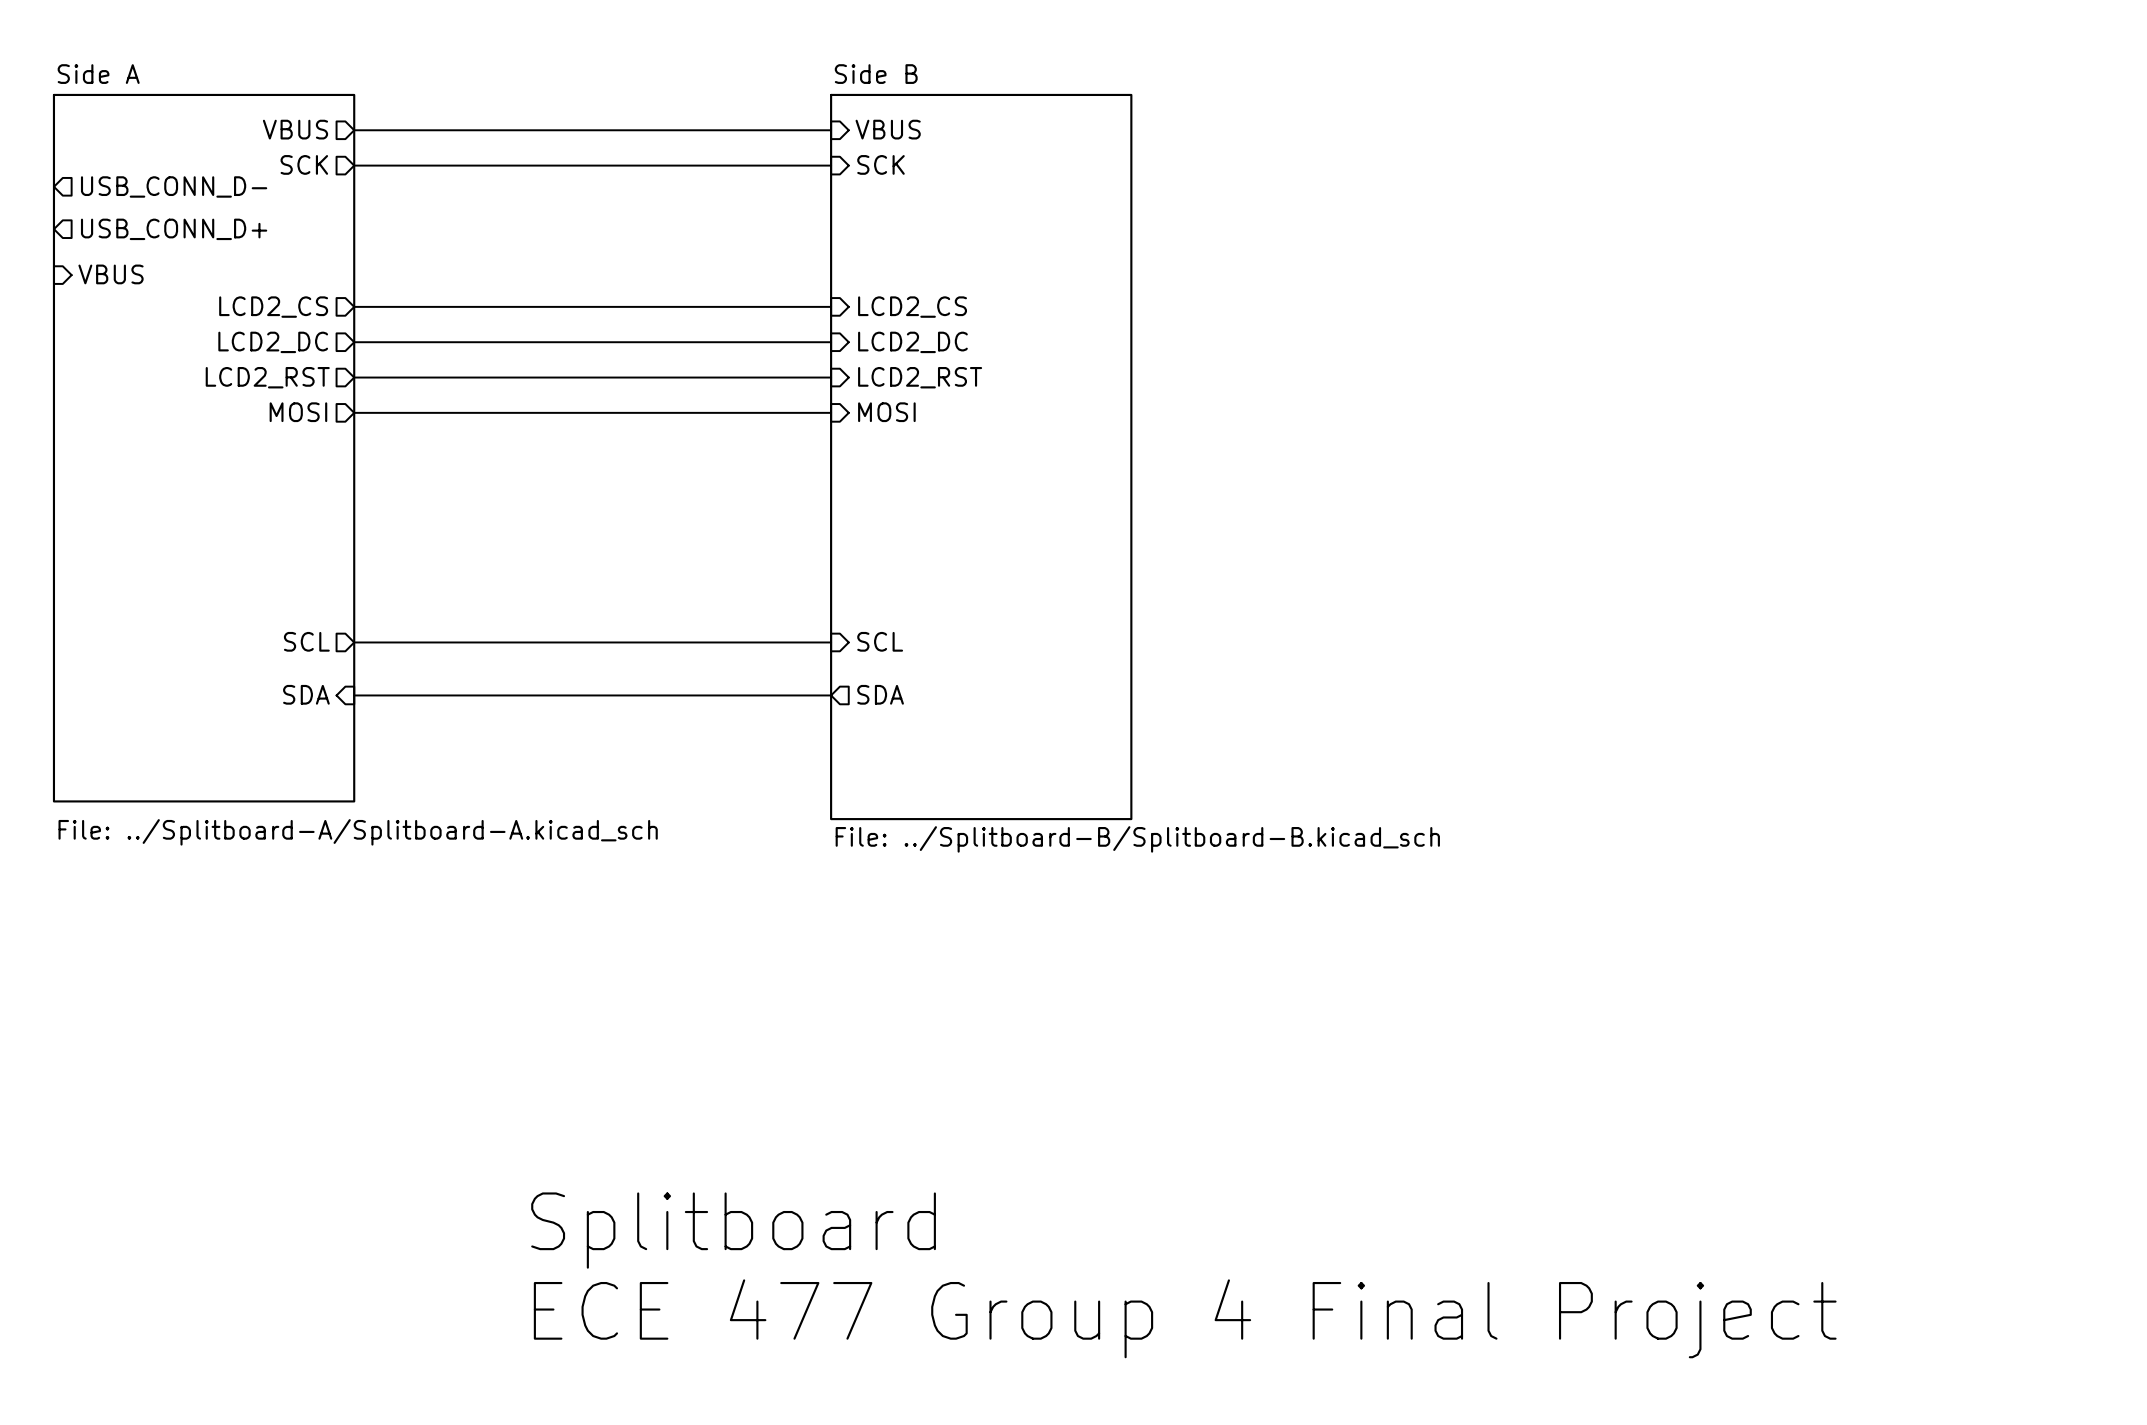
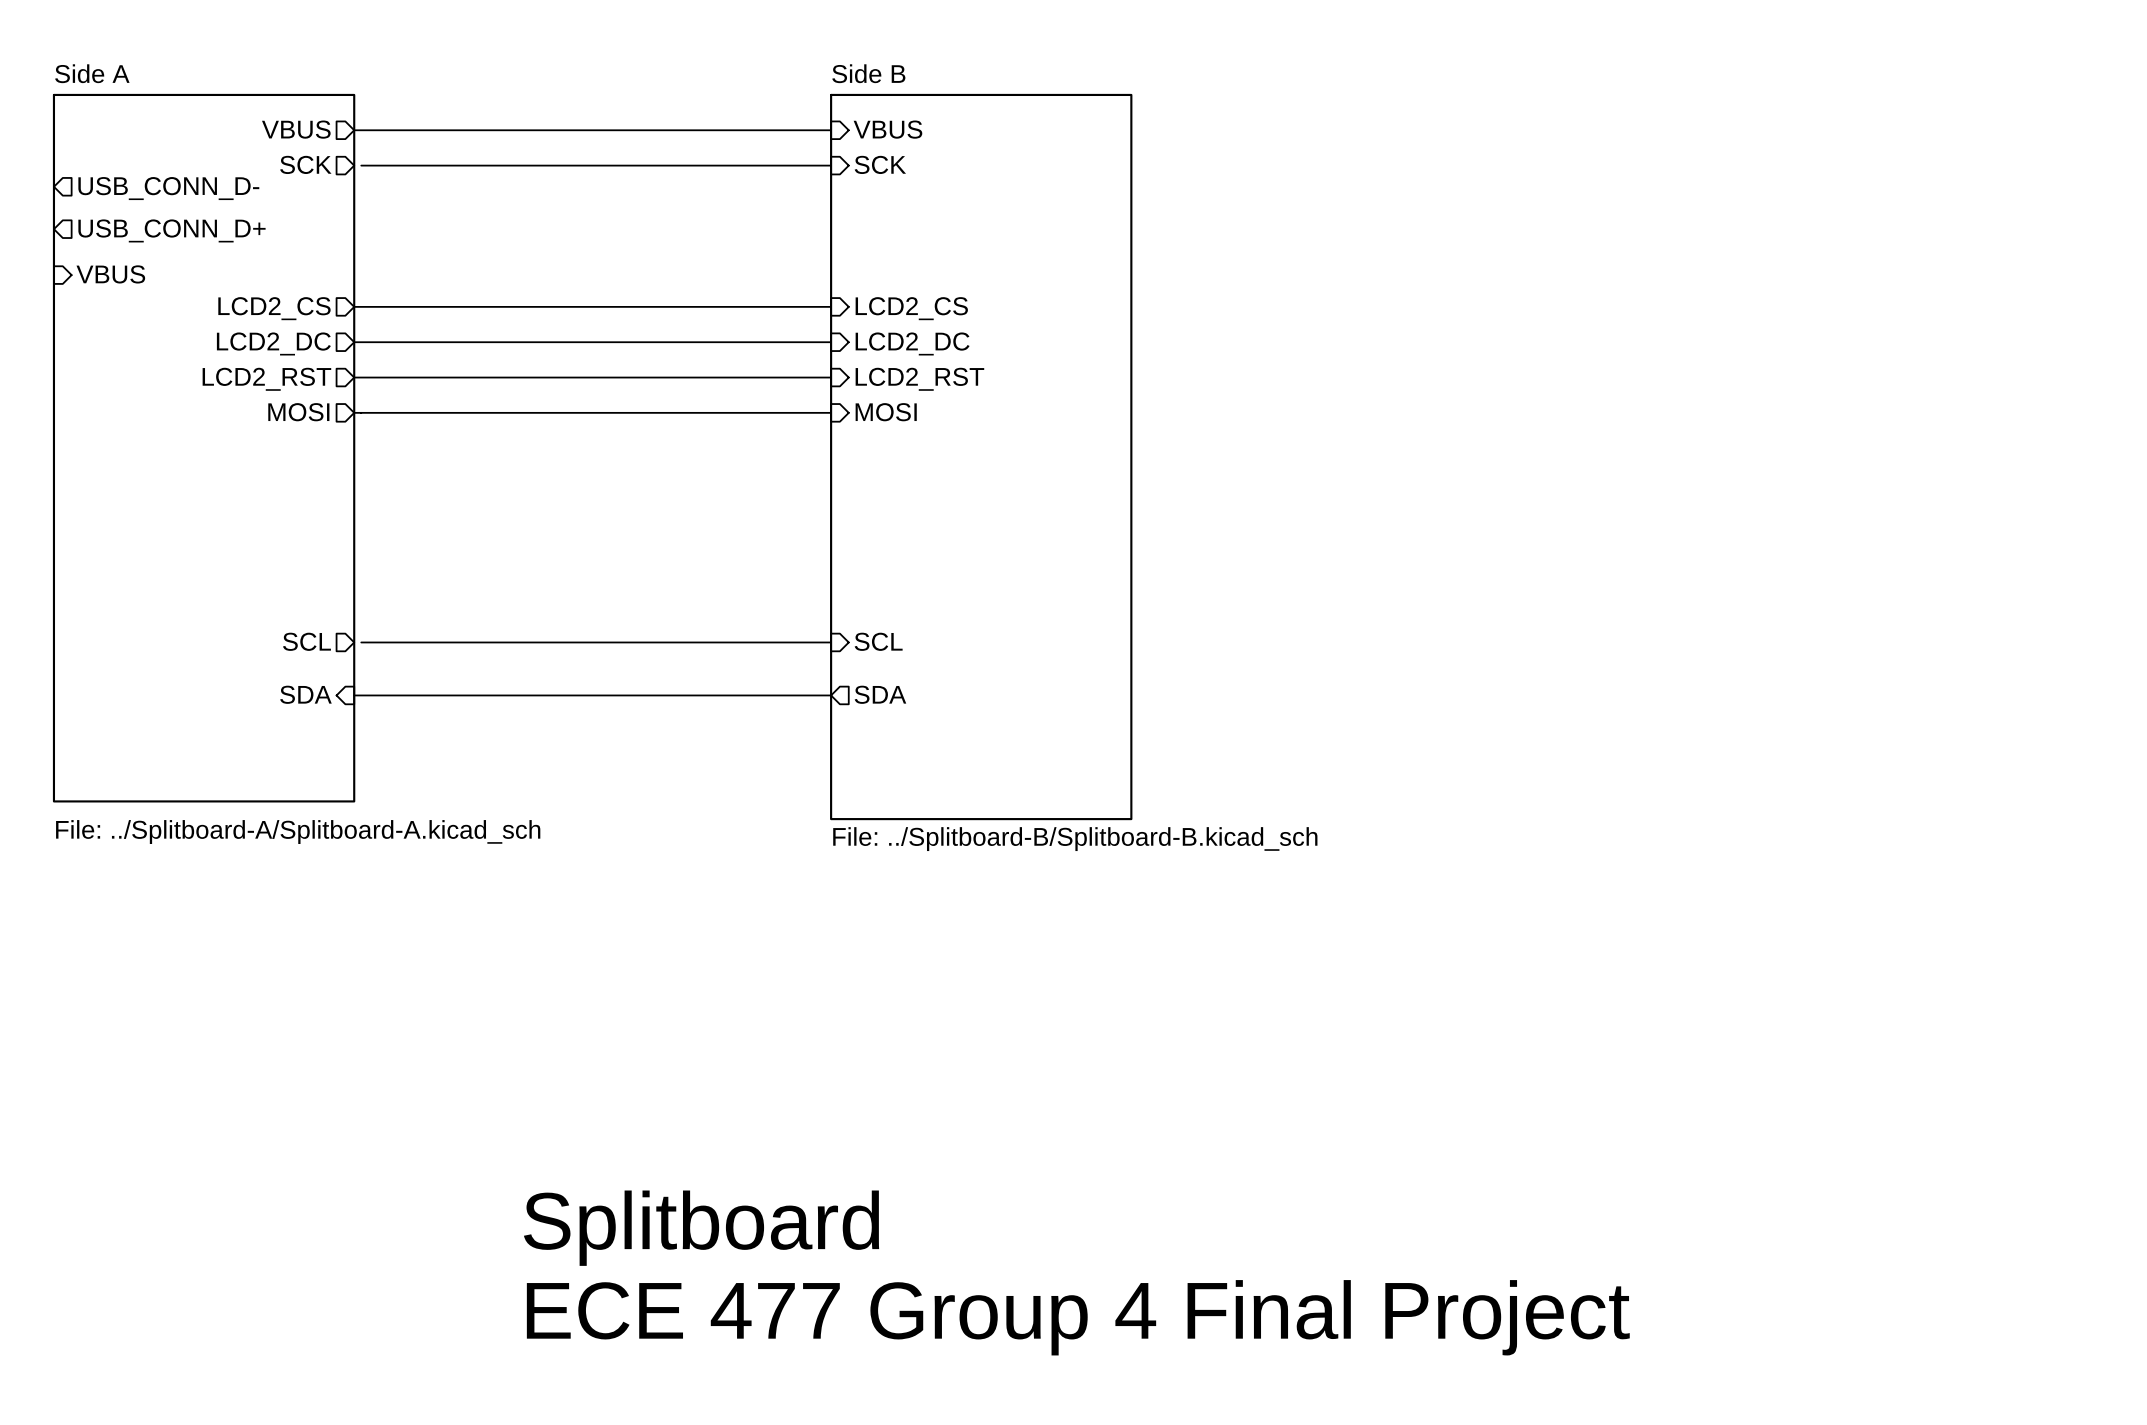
wire: (354, 165) (361, 165) -> none
wire: (354, 642) (361, 642) -> none

